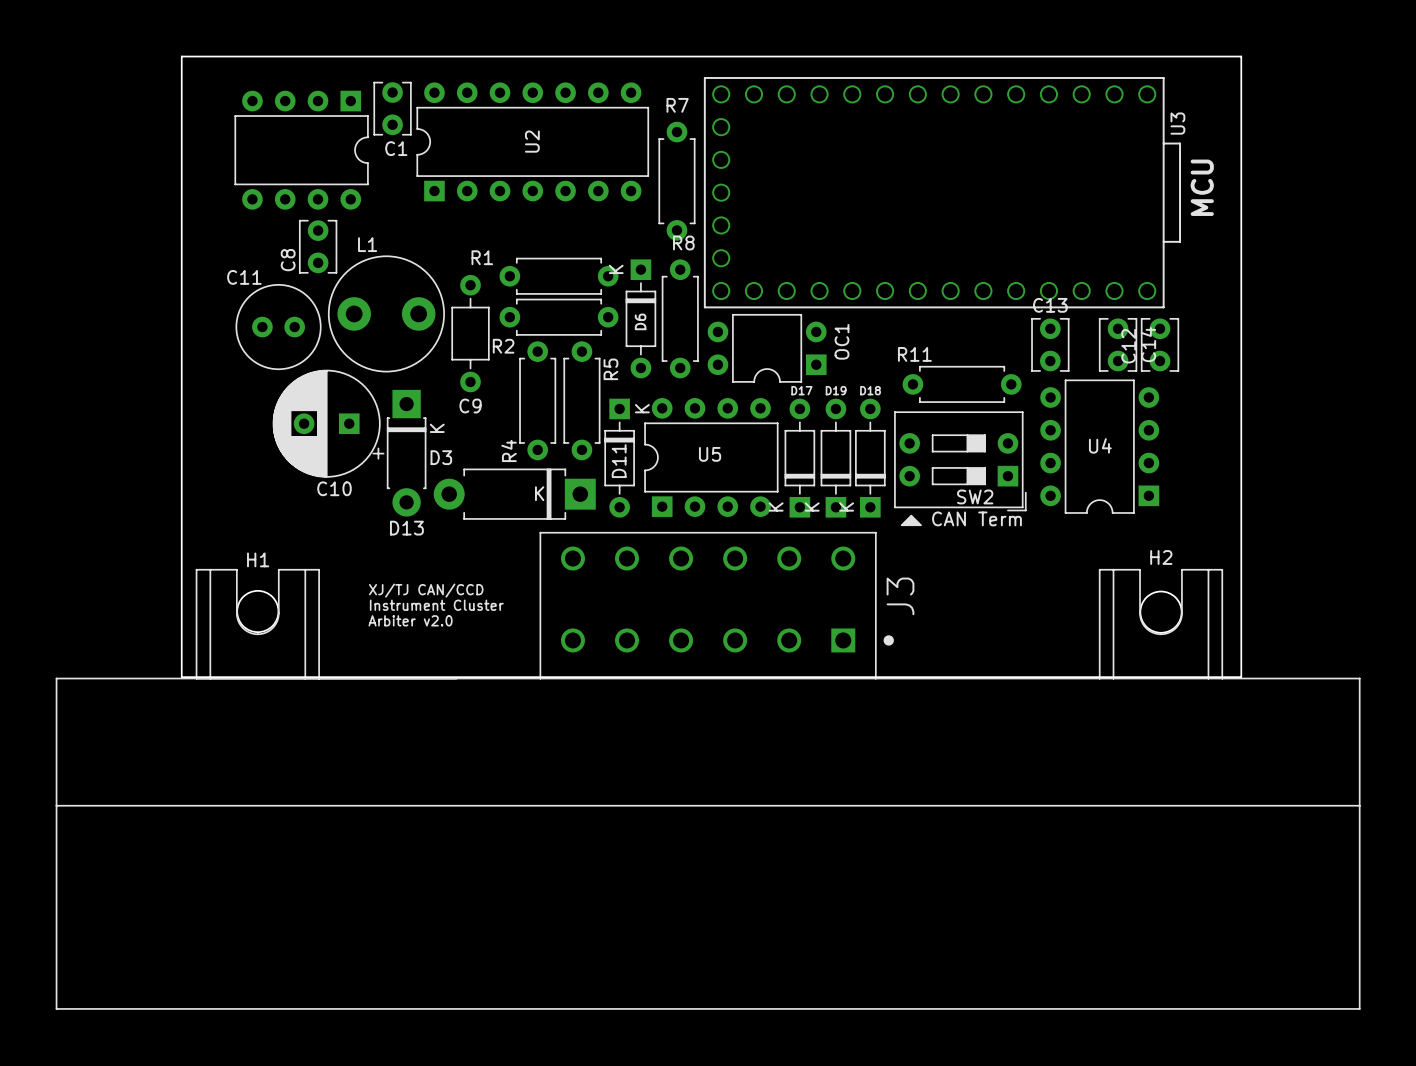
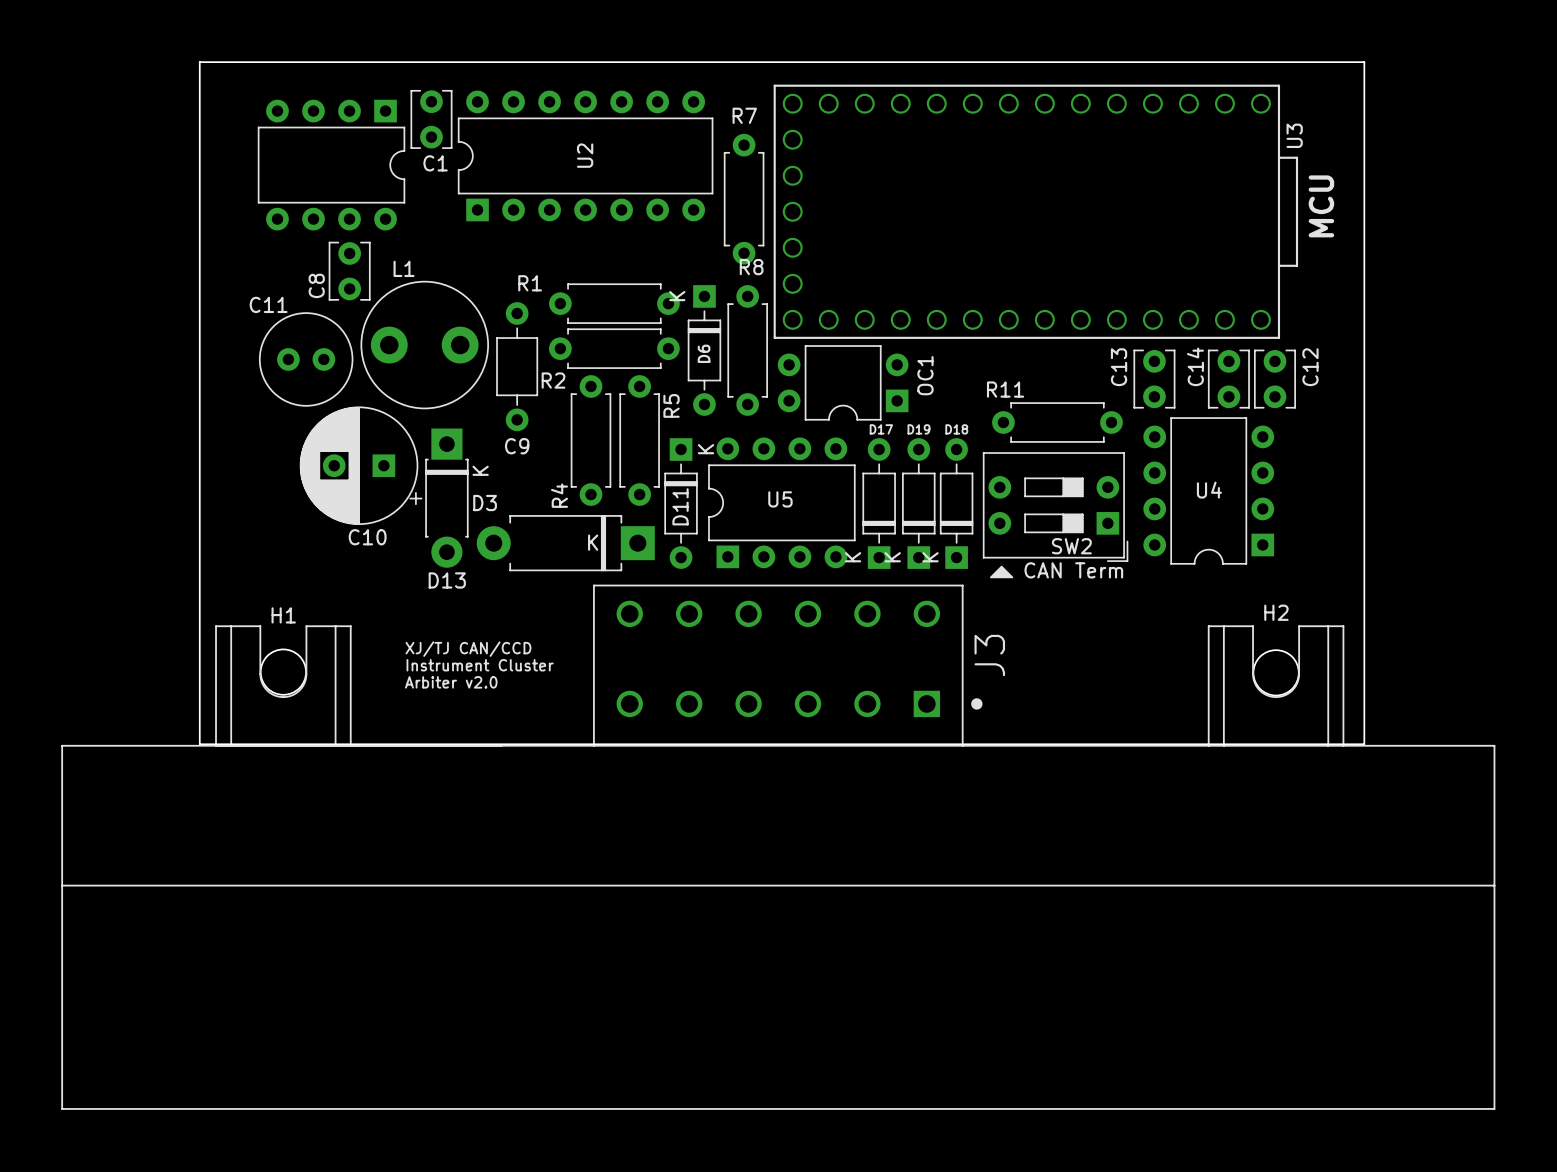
C13 name rotation: 0° (1050, 305) -> 90° counterclockwise (1119, 367)
C14 name position: C14 (1148, 344) -> C14 (1195, 366)
C12 name position: C12 (1128, 346) -> C12 (1310, 367)

